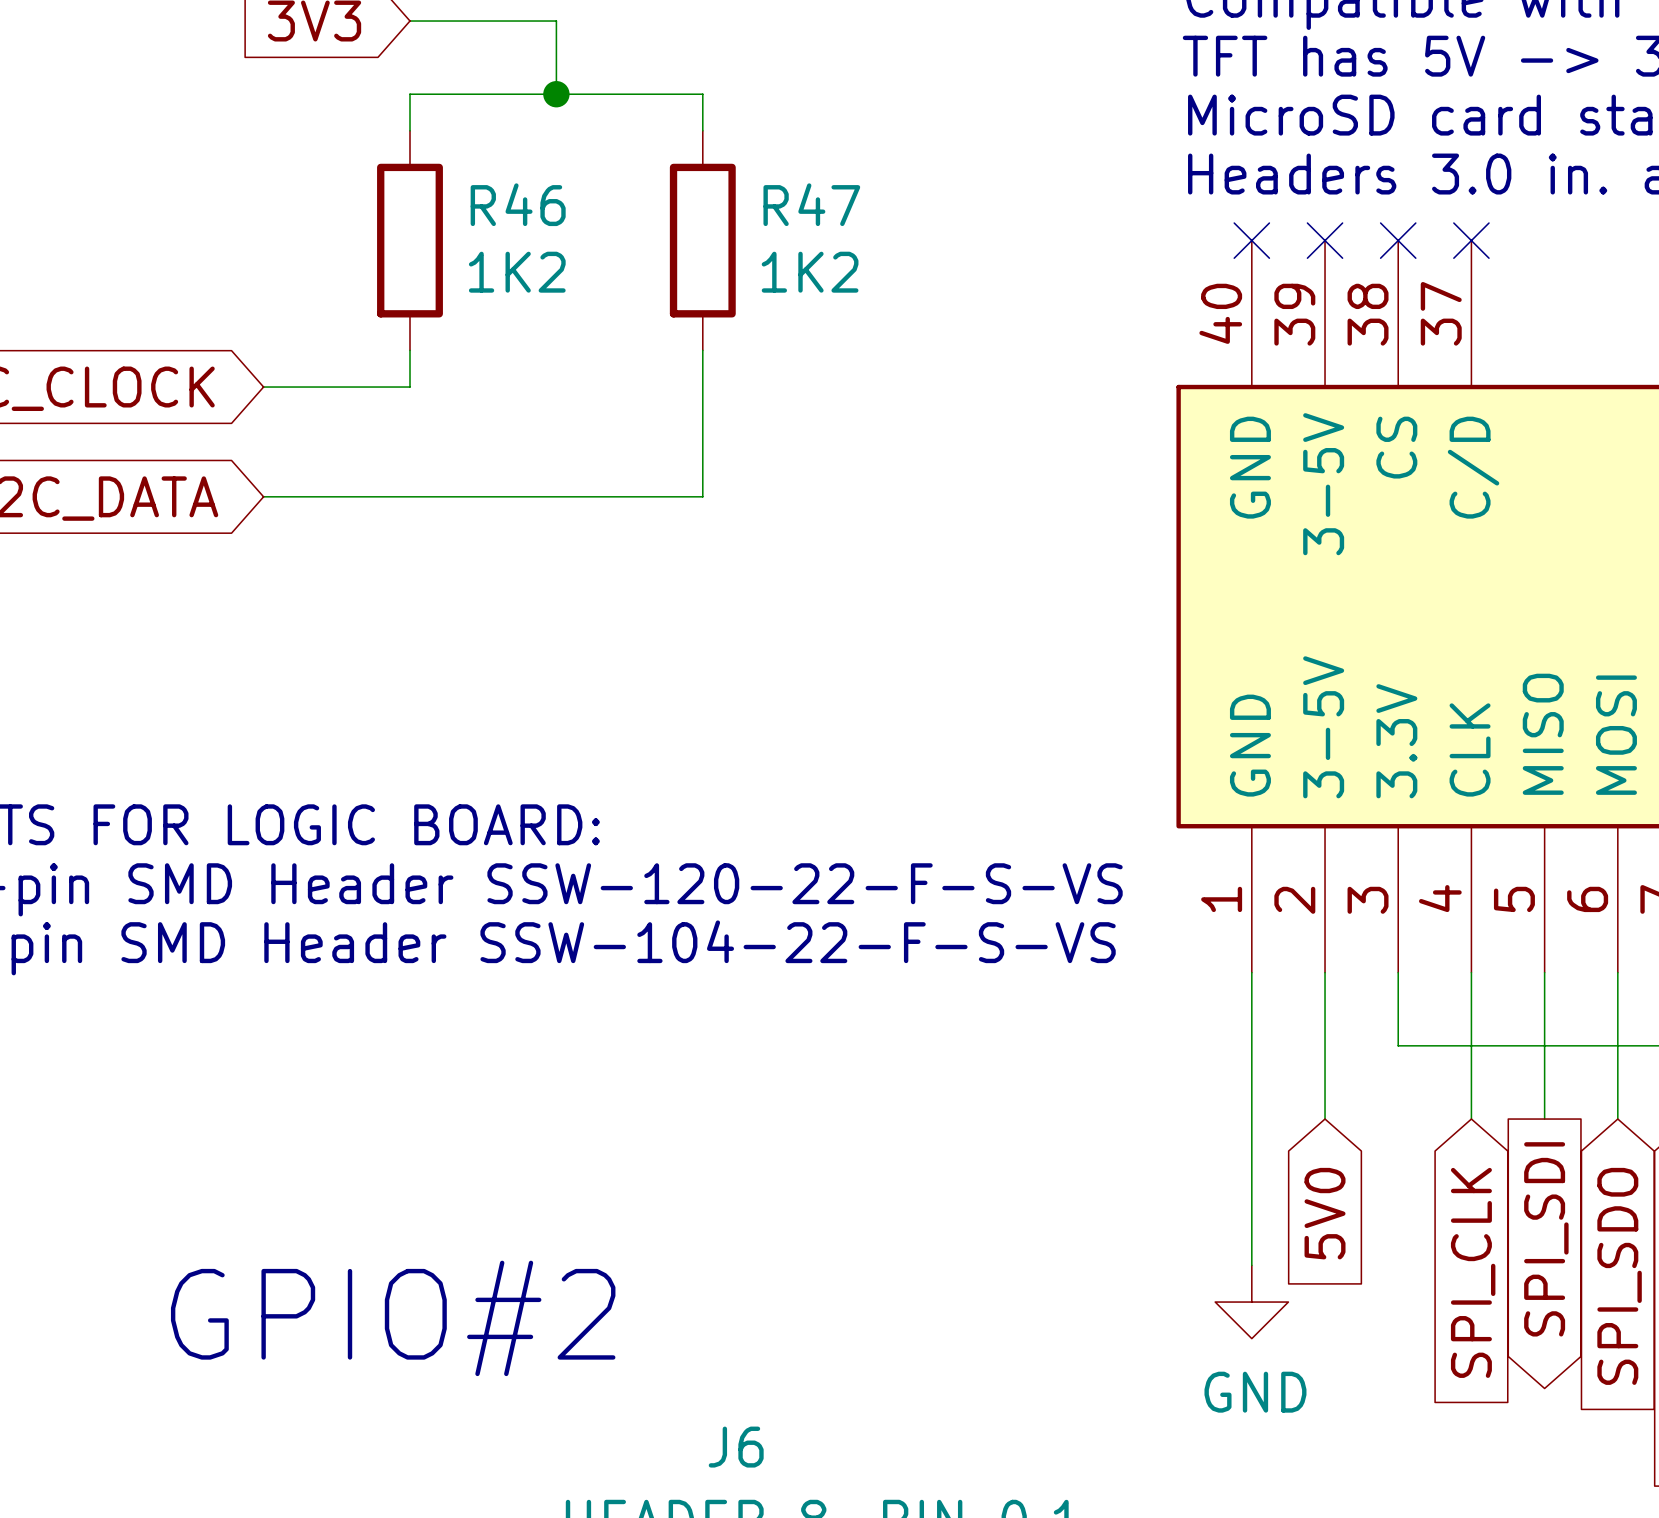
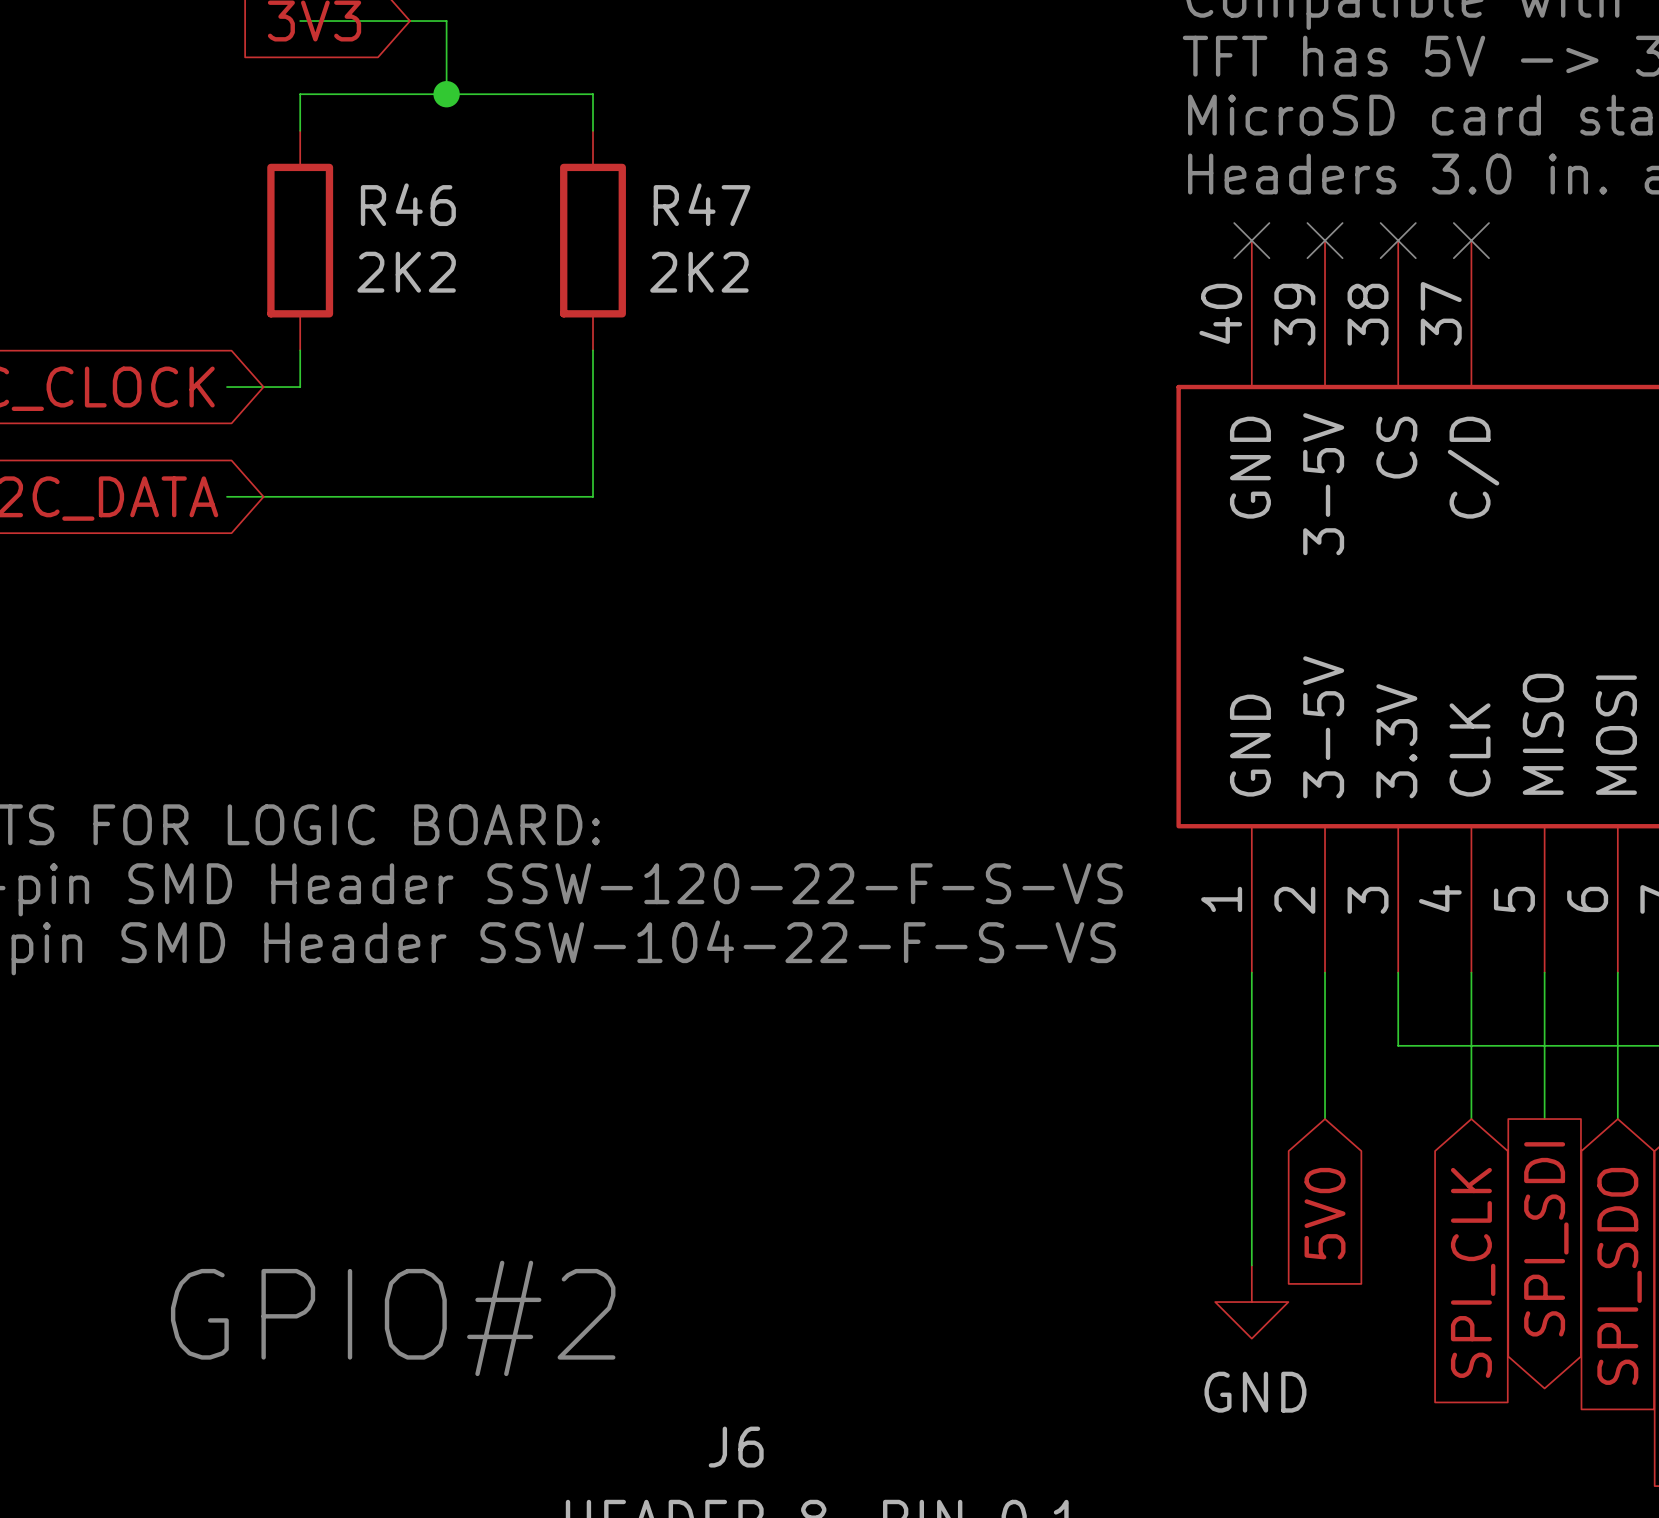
wire: none -> (300, 21) (410, 21)
wire: (446, 21) (556, 21) (556, 94) -> (446, 21) (446, 94)
wire: (410, 94) (410, 130) -> (410, 94) (300, 94) (300, 130)
junction position: (556, 94) -> (446, 94)
wire: (593, 94) (702, 94) (702, 130) -> (593, 94) (593, 130)
R46 position: (410, 240) -> (300, 240)
R47 position: (702, 240) -> (593, 240)
R46 value: 1K2 (517, 272) -> 2K2 (406, 272)
R47 value: 1K2 (810, 272) -> 2K2 (699, 272)
wire: (410, 350) (410, 387) (300, 387) -> (300, 350) (300, 387)
wire: (702, 350) (702, 496) (593, 496) -> (593, 350) (593, 496)
wire: none -> (226, 387) (263, 387)
wire: none -> (226, 496) (263, 496)

